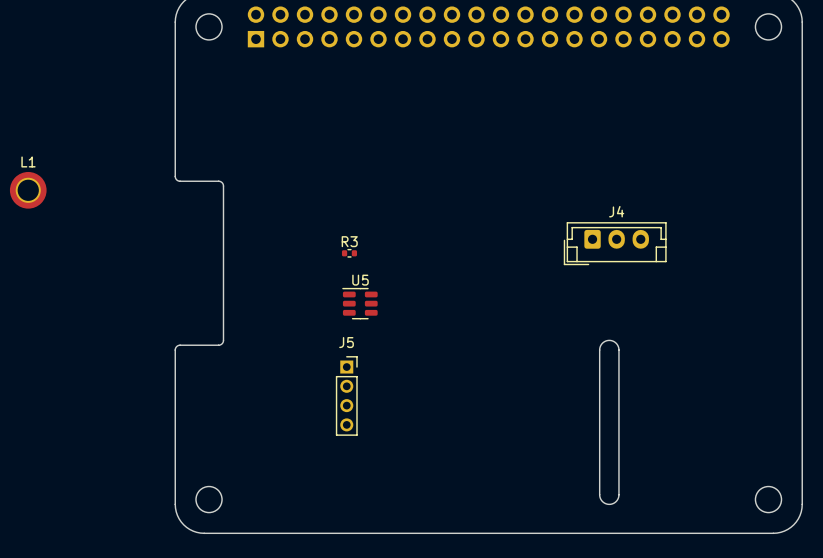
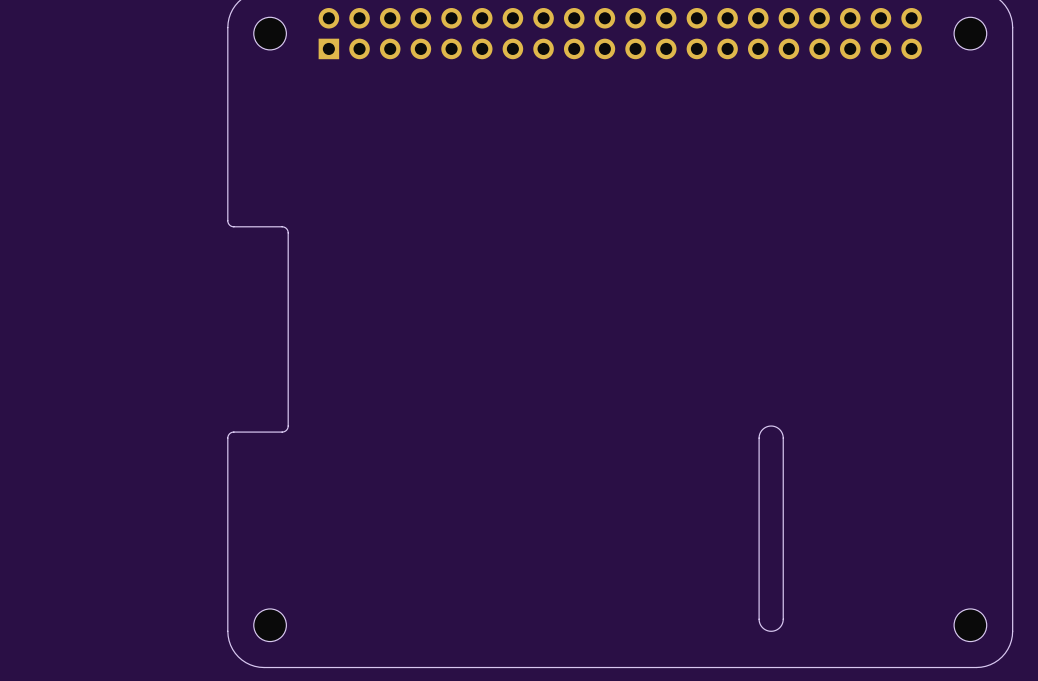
L1: (28, 190) -> none
J4: (615, 243) -> none
R3: (349, 253) -> none
U5: (360, 303) -> none
J5: (346, 395) -> none

